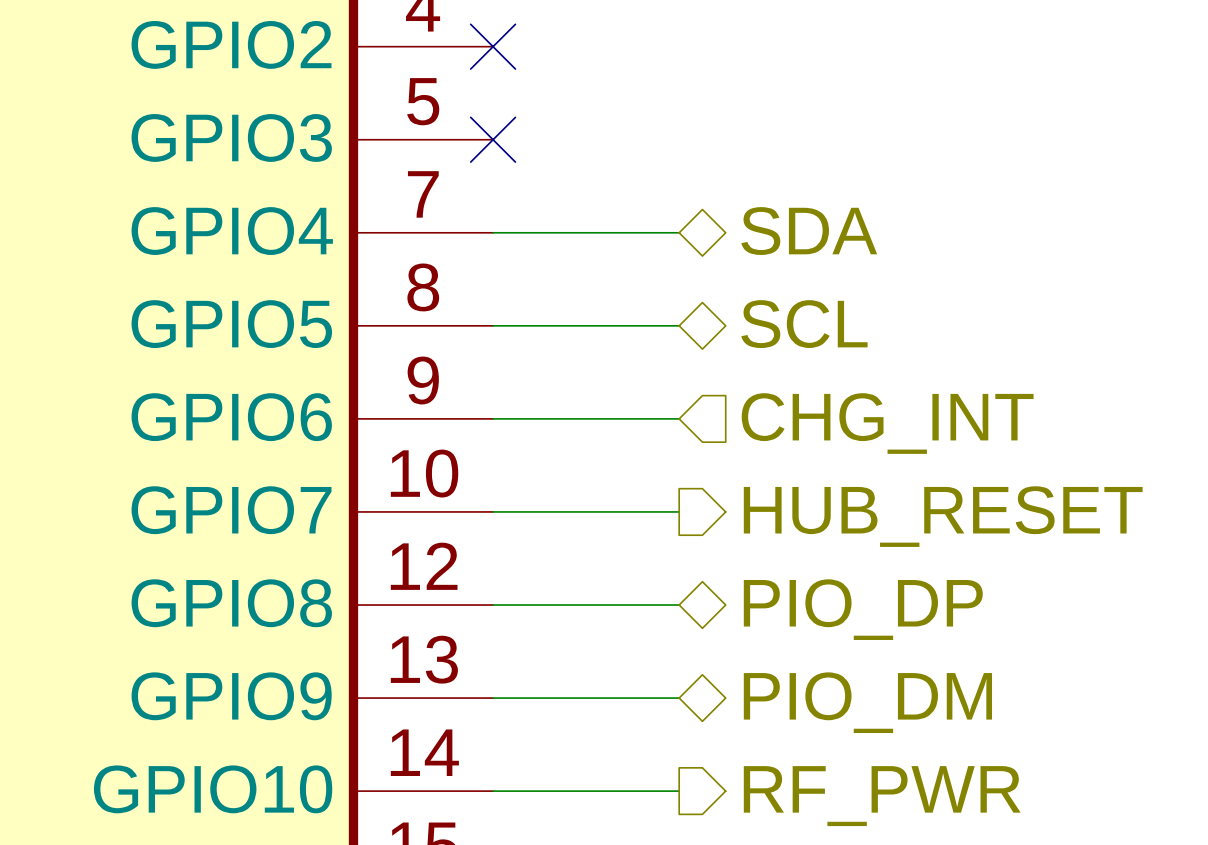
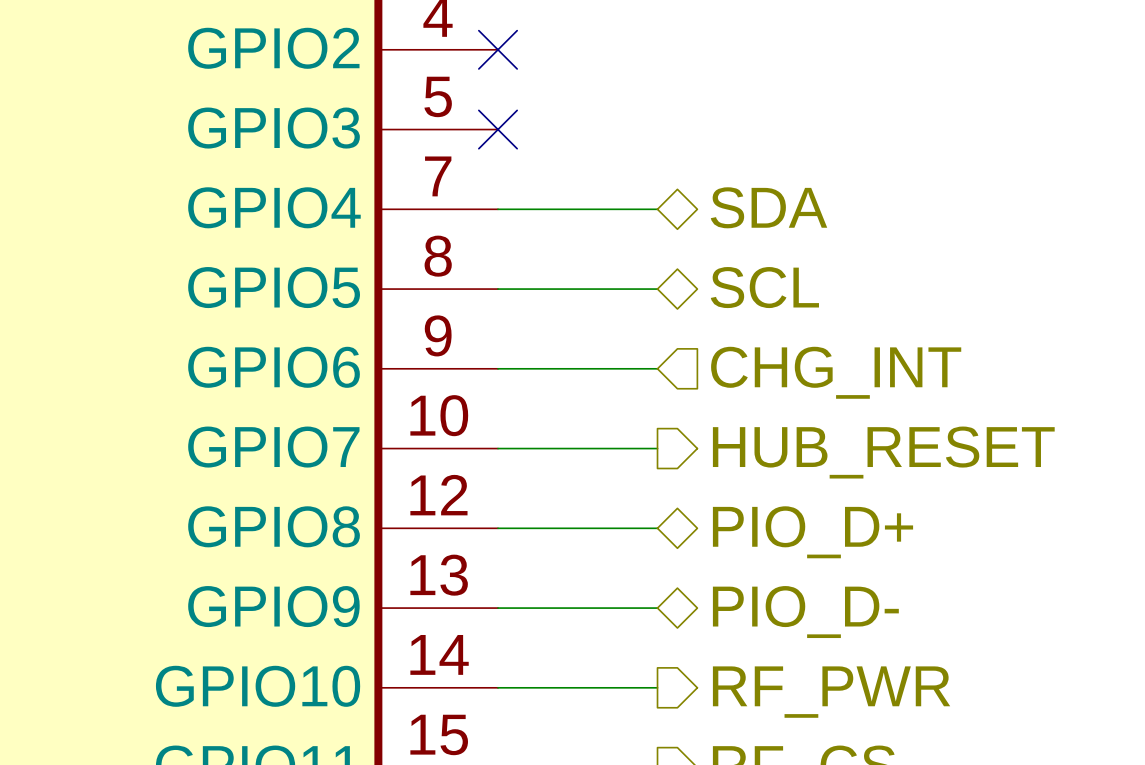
hierarchical label: PIO_DP (863, 609) -> PIO_D+ (813, 532)
hierarchical label: PIO_DM (867, 702) -> PIO_D- (805, 612)

